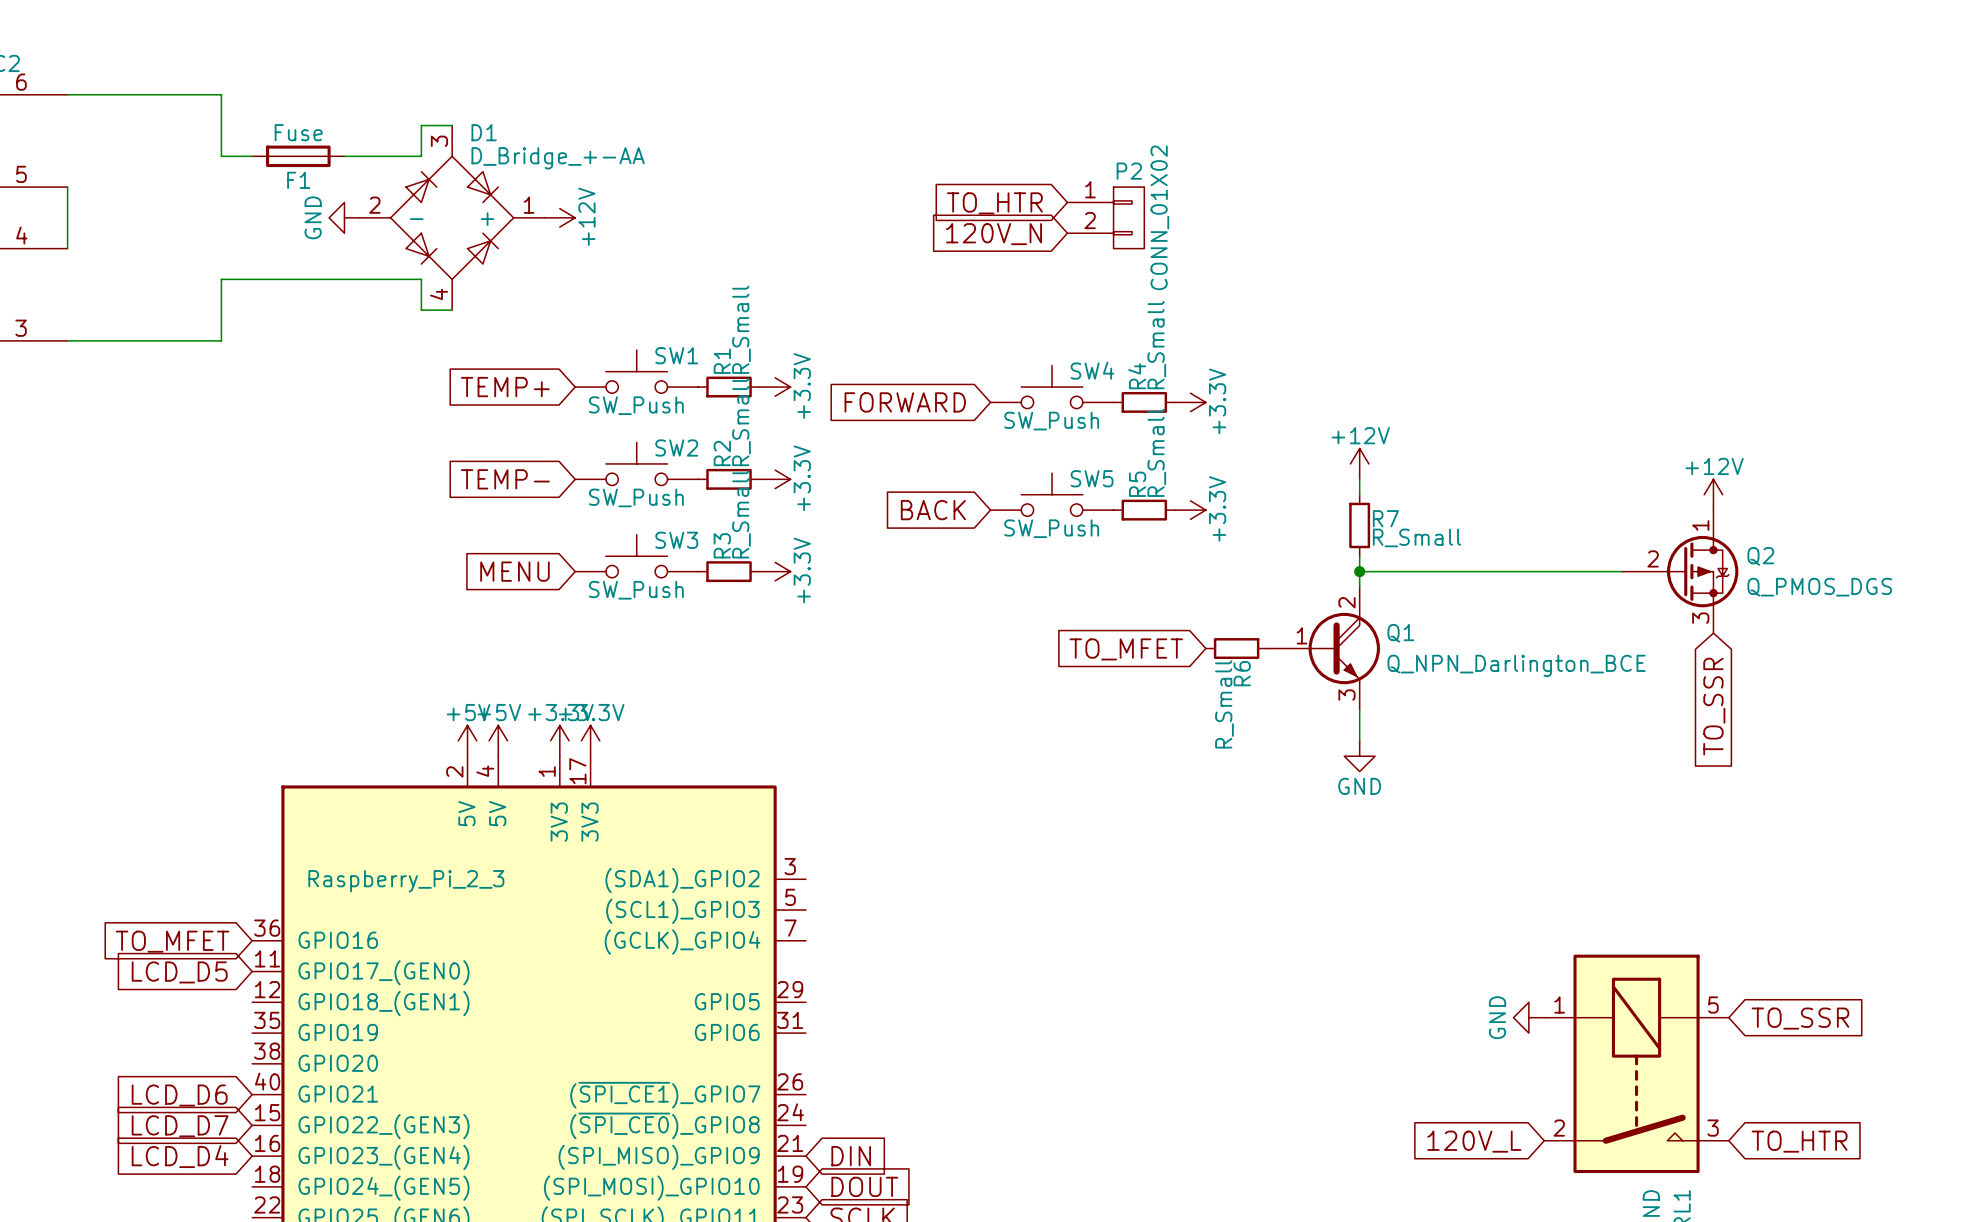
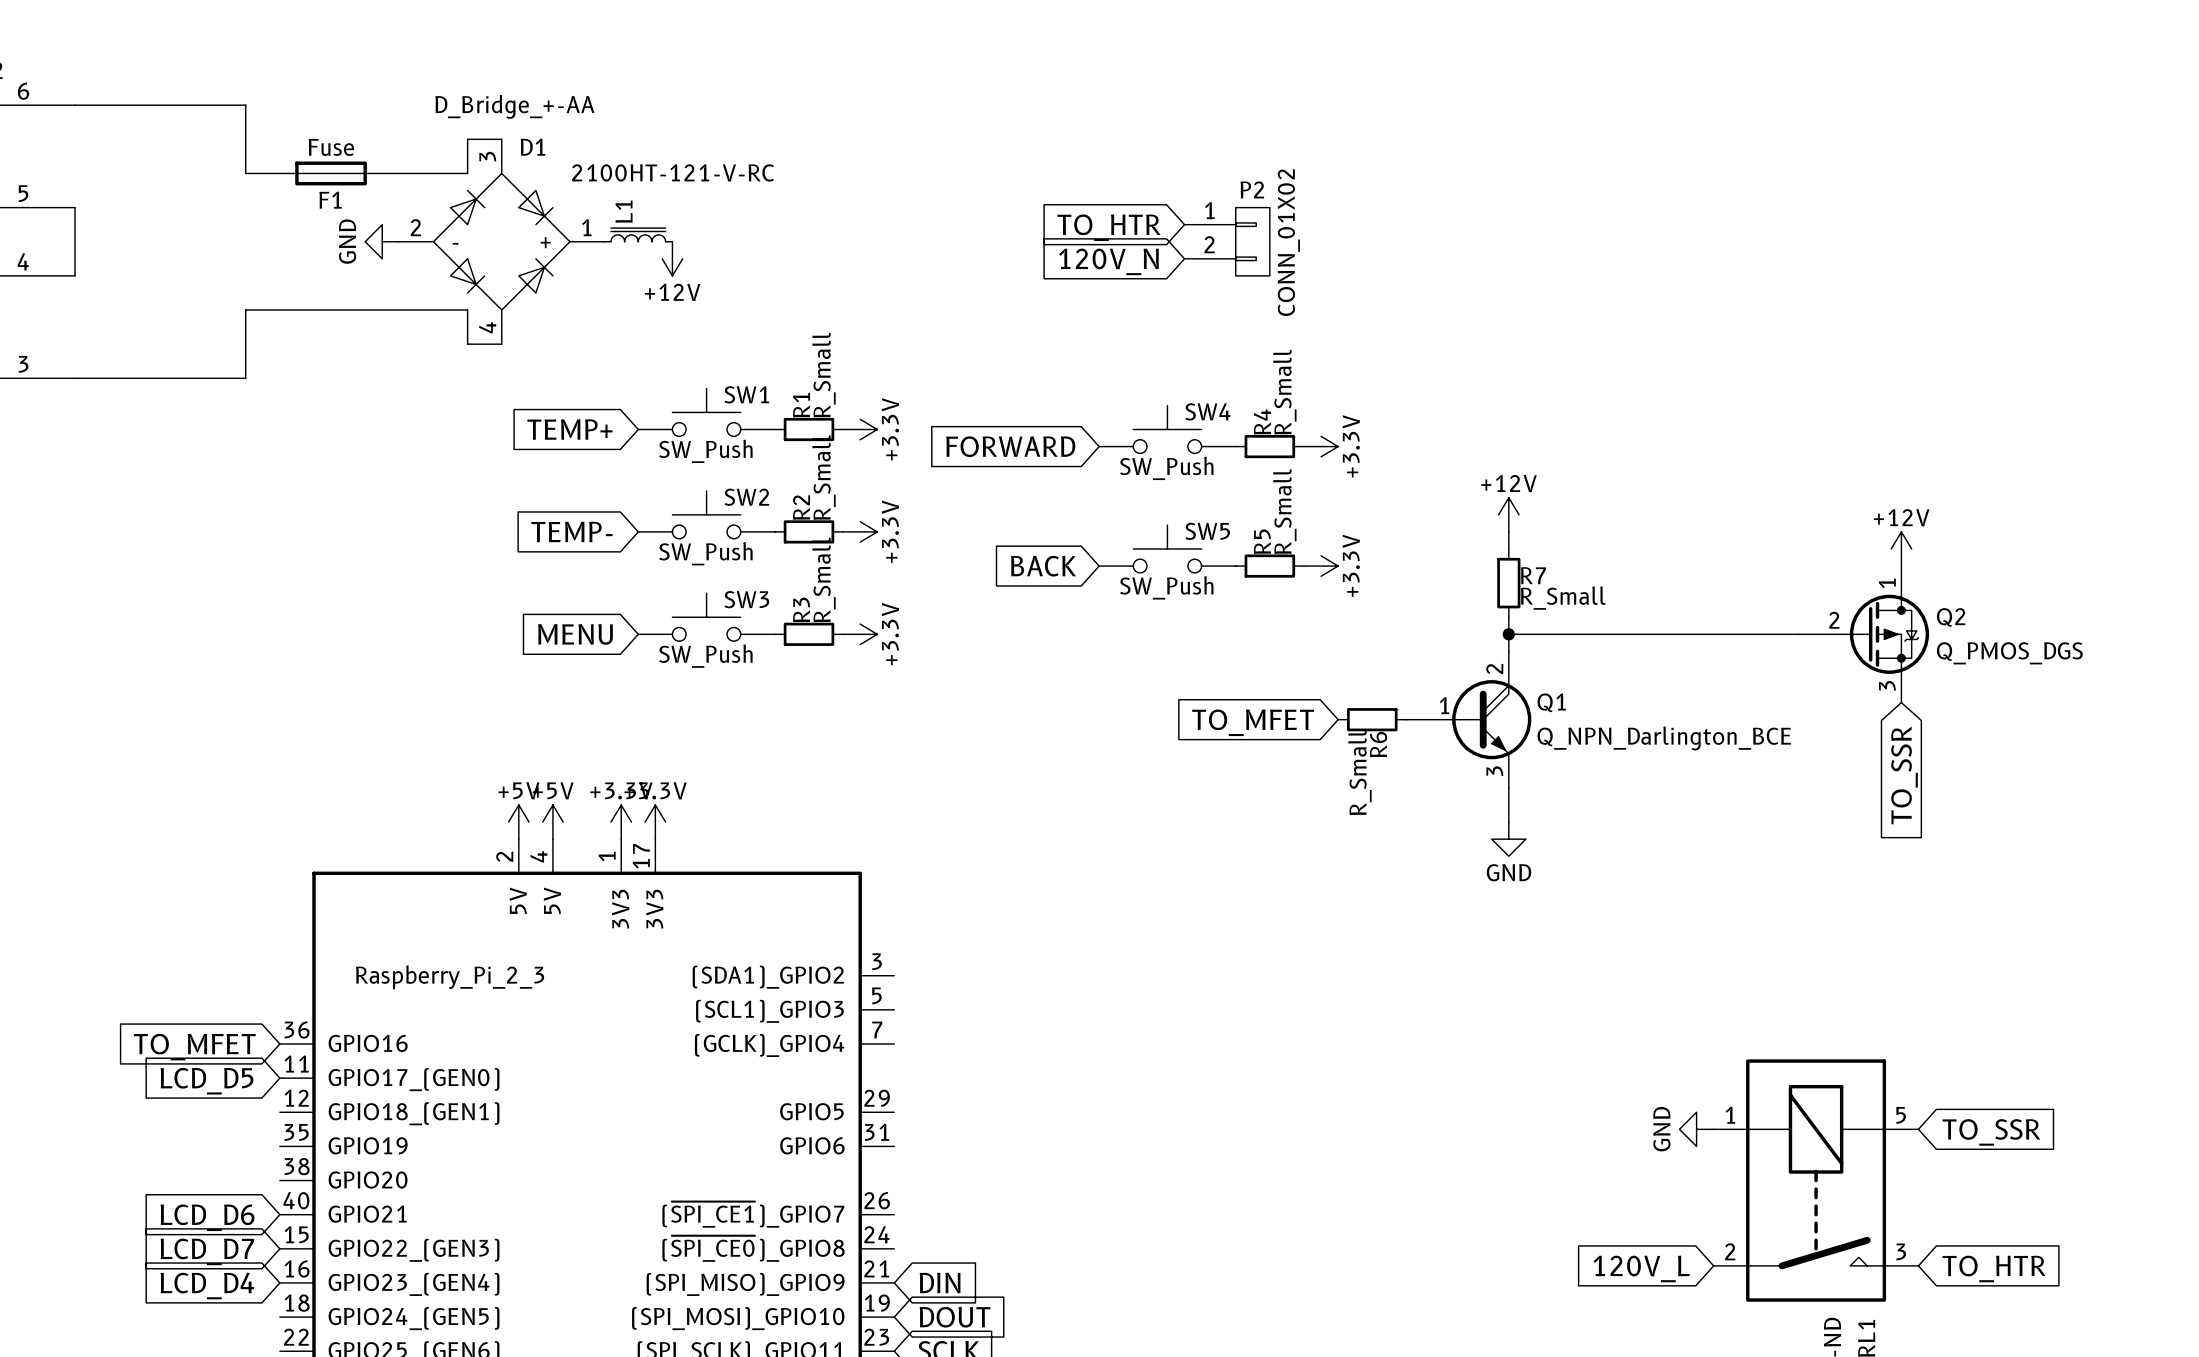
D1 value position: D_Bridge_+-AA (558, 158) -> D_Bridge_+-AA (514, 106)
L1: none -> 2100HT-121-V-RC (638, 234)
power symbol rotation: 0° (559, 217) -> 90° clockwise (672, 258)
power symbol position: +12V (559, 217) -> +12V (672, 258)

